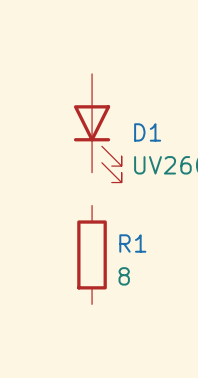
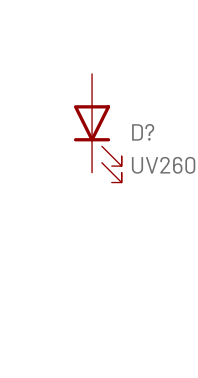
D1 name: D1 (147, 132) -> D? (143, 132)
R1: 8 (92, 254) -> none

